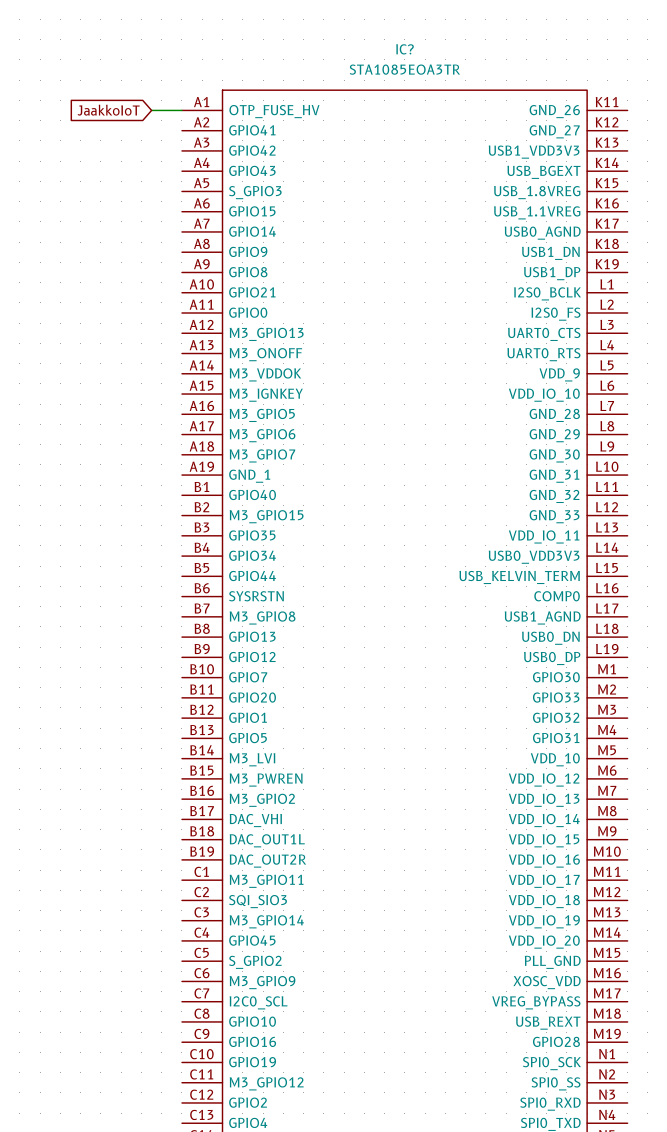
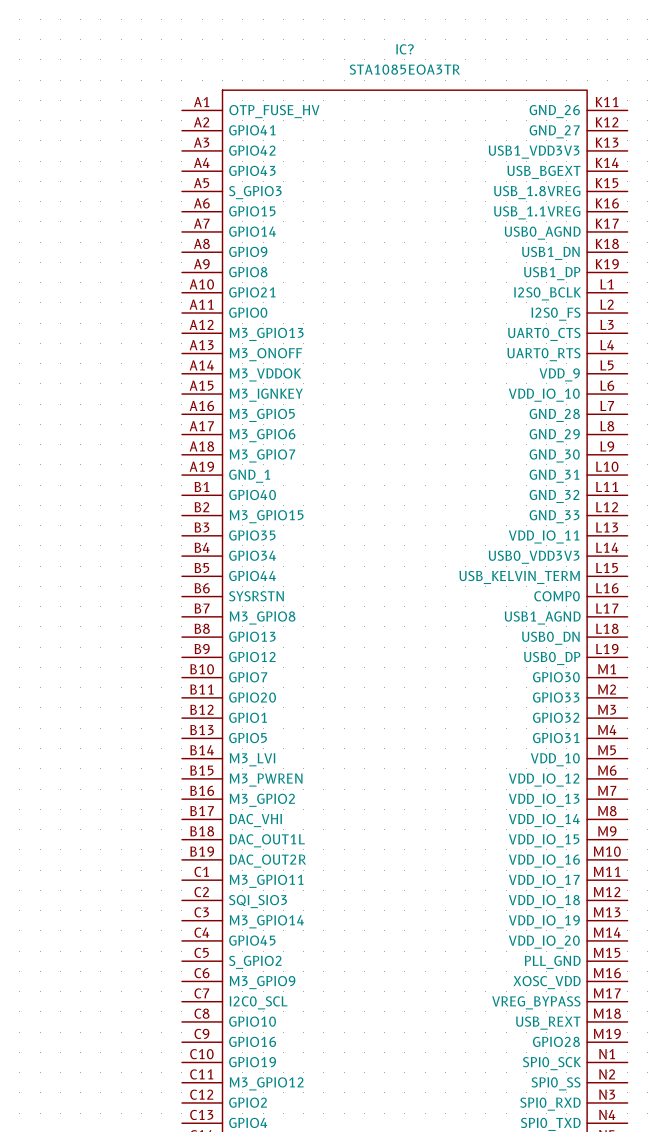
global label: JaakkoIoT (108, 110) -> none
wire: (151, 110) (181, 110) -> none

